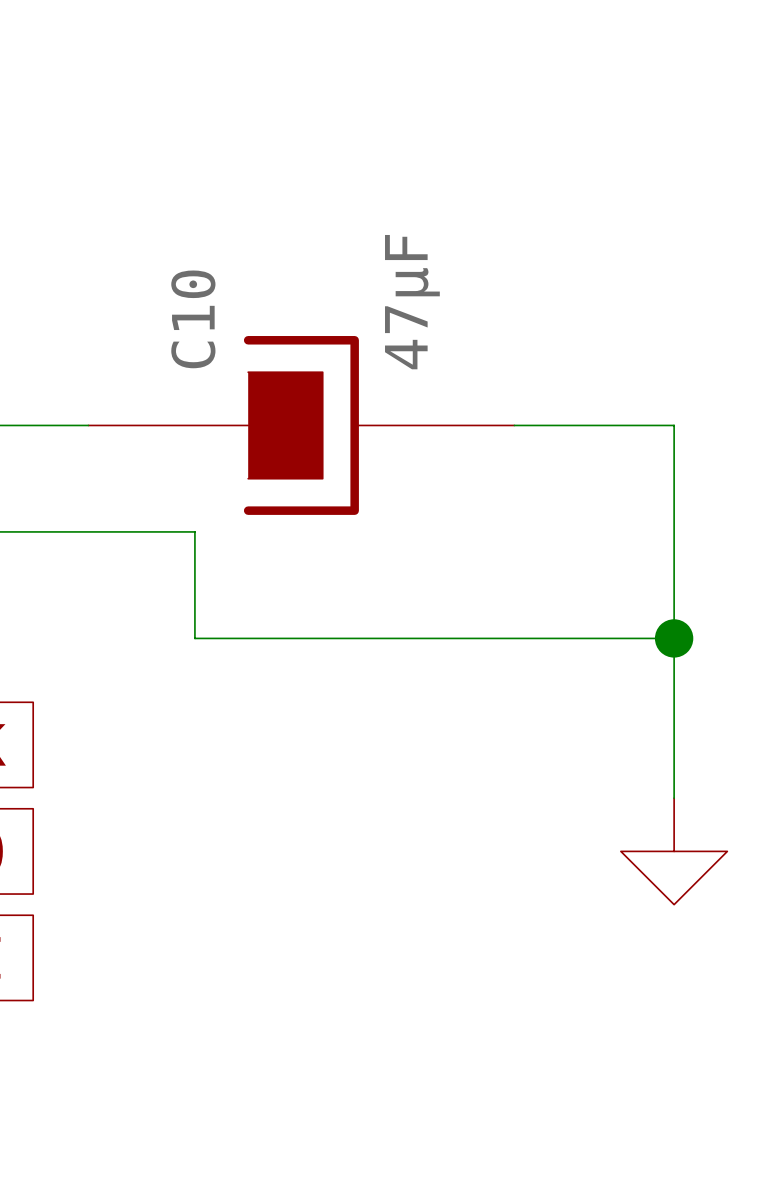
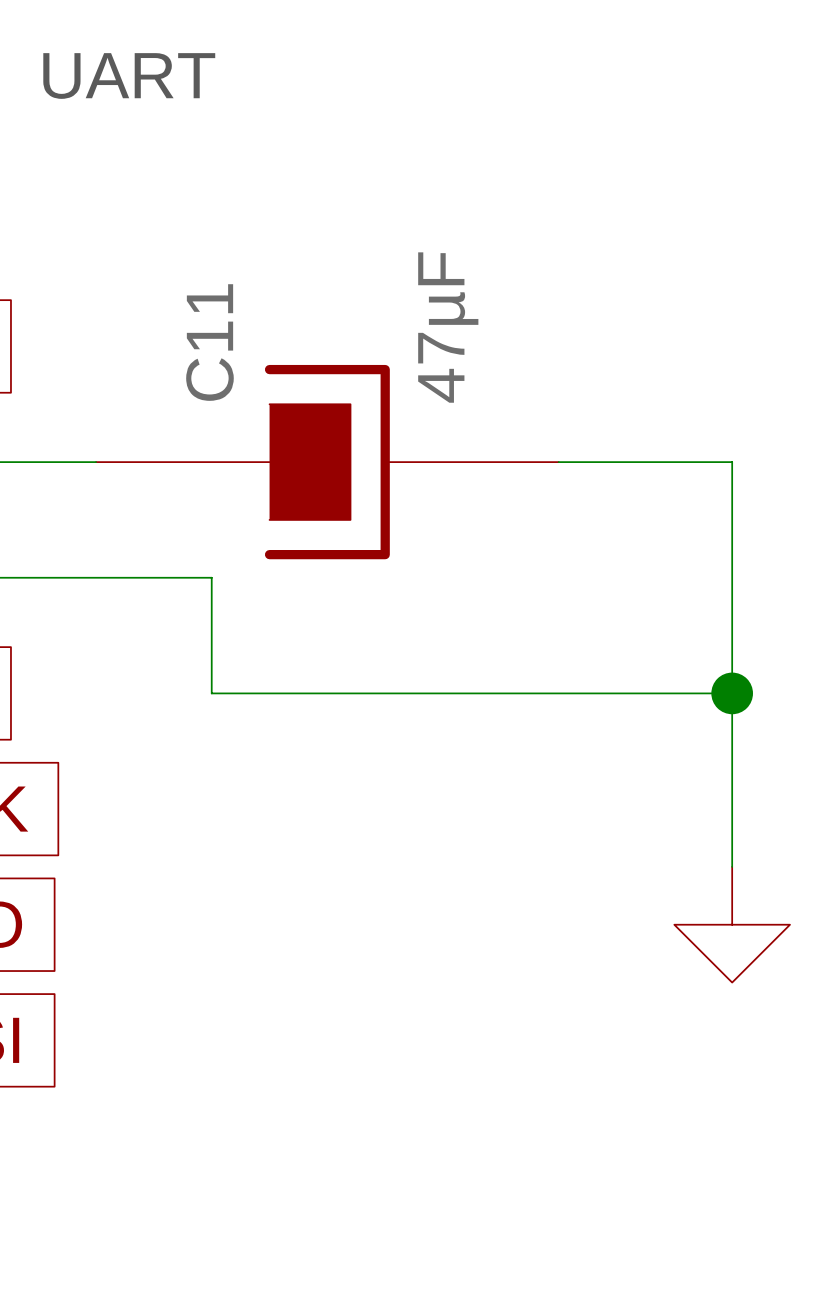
text: none -> UART (129, 76)
C10 name: C10 (193, 319) -> C11 (209, 342)

